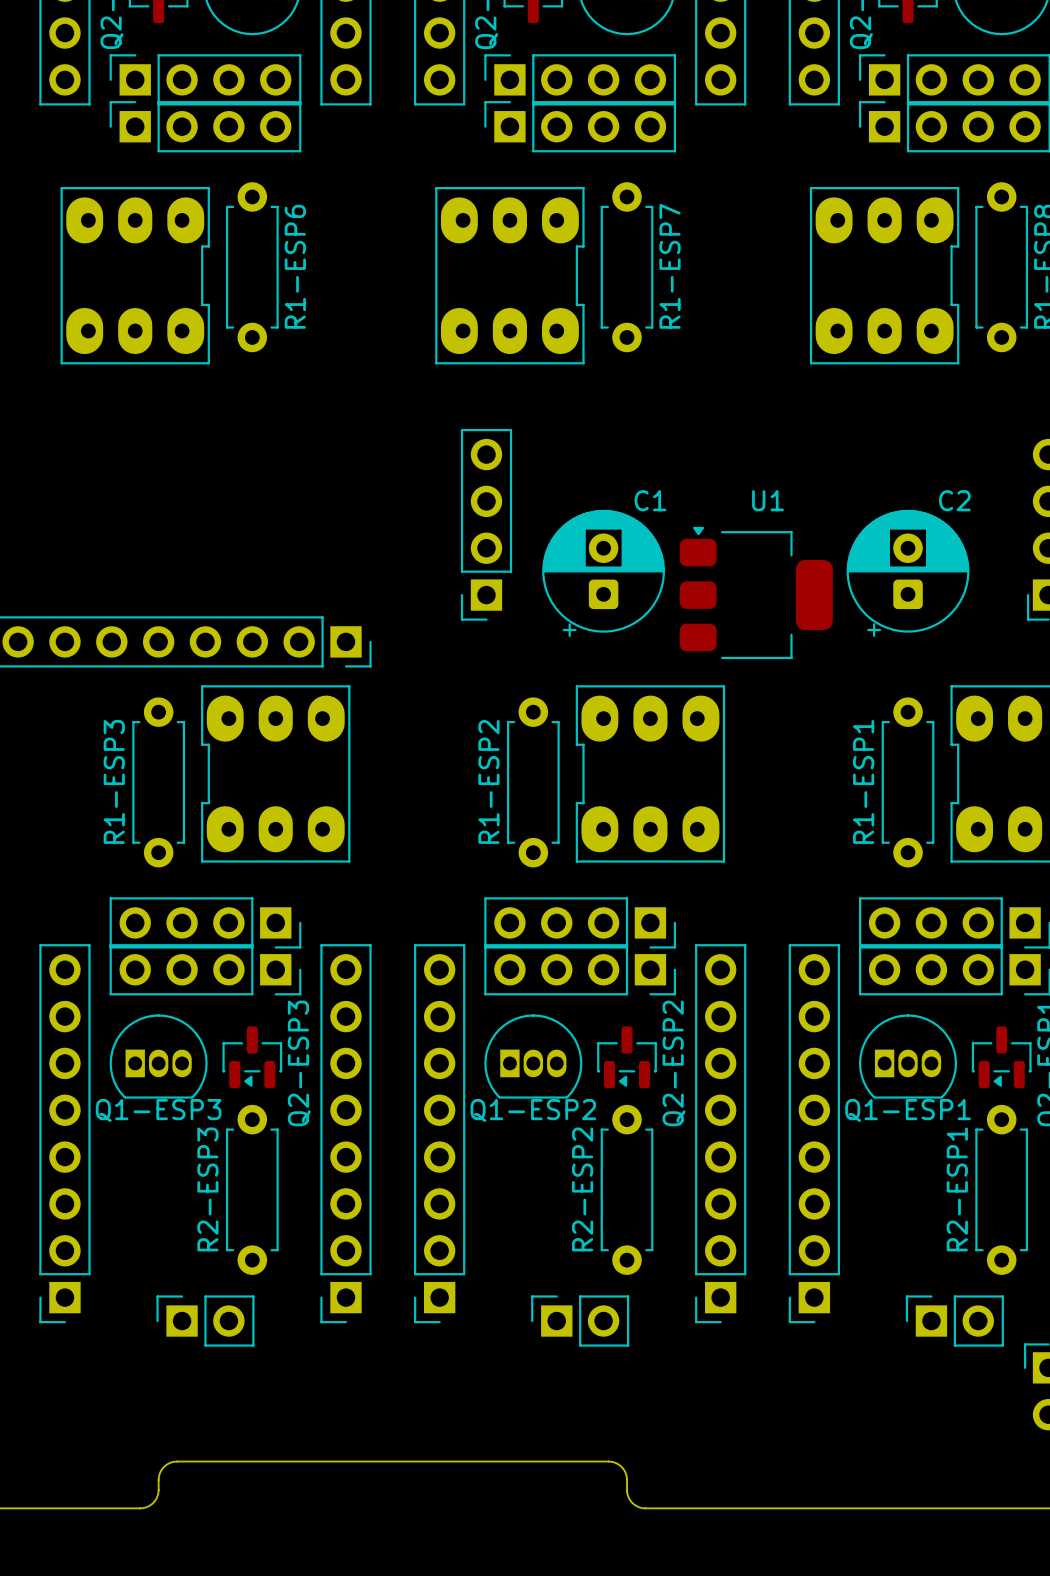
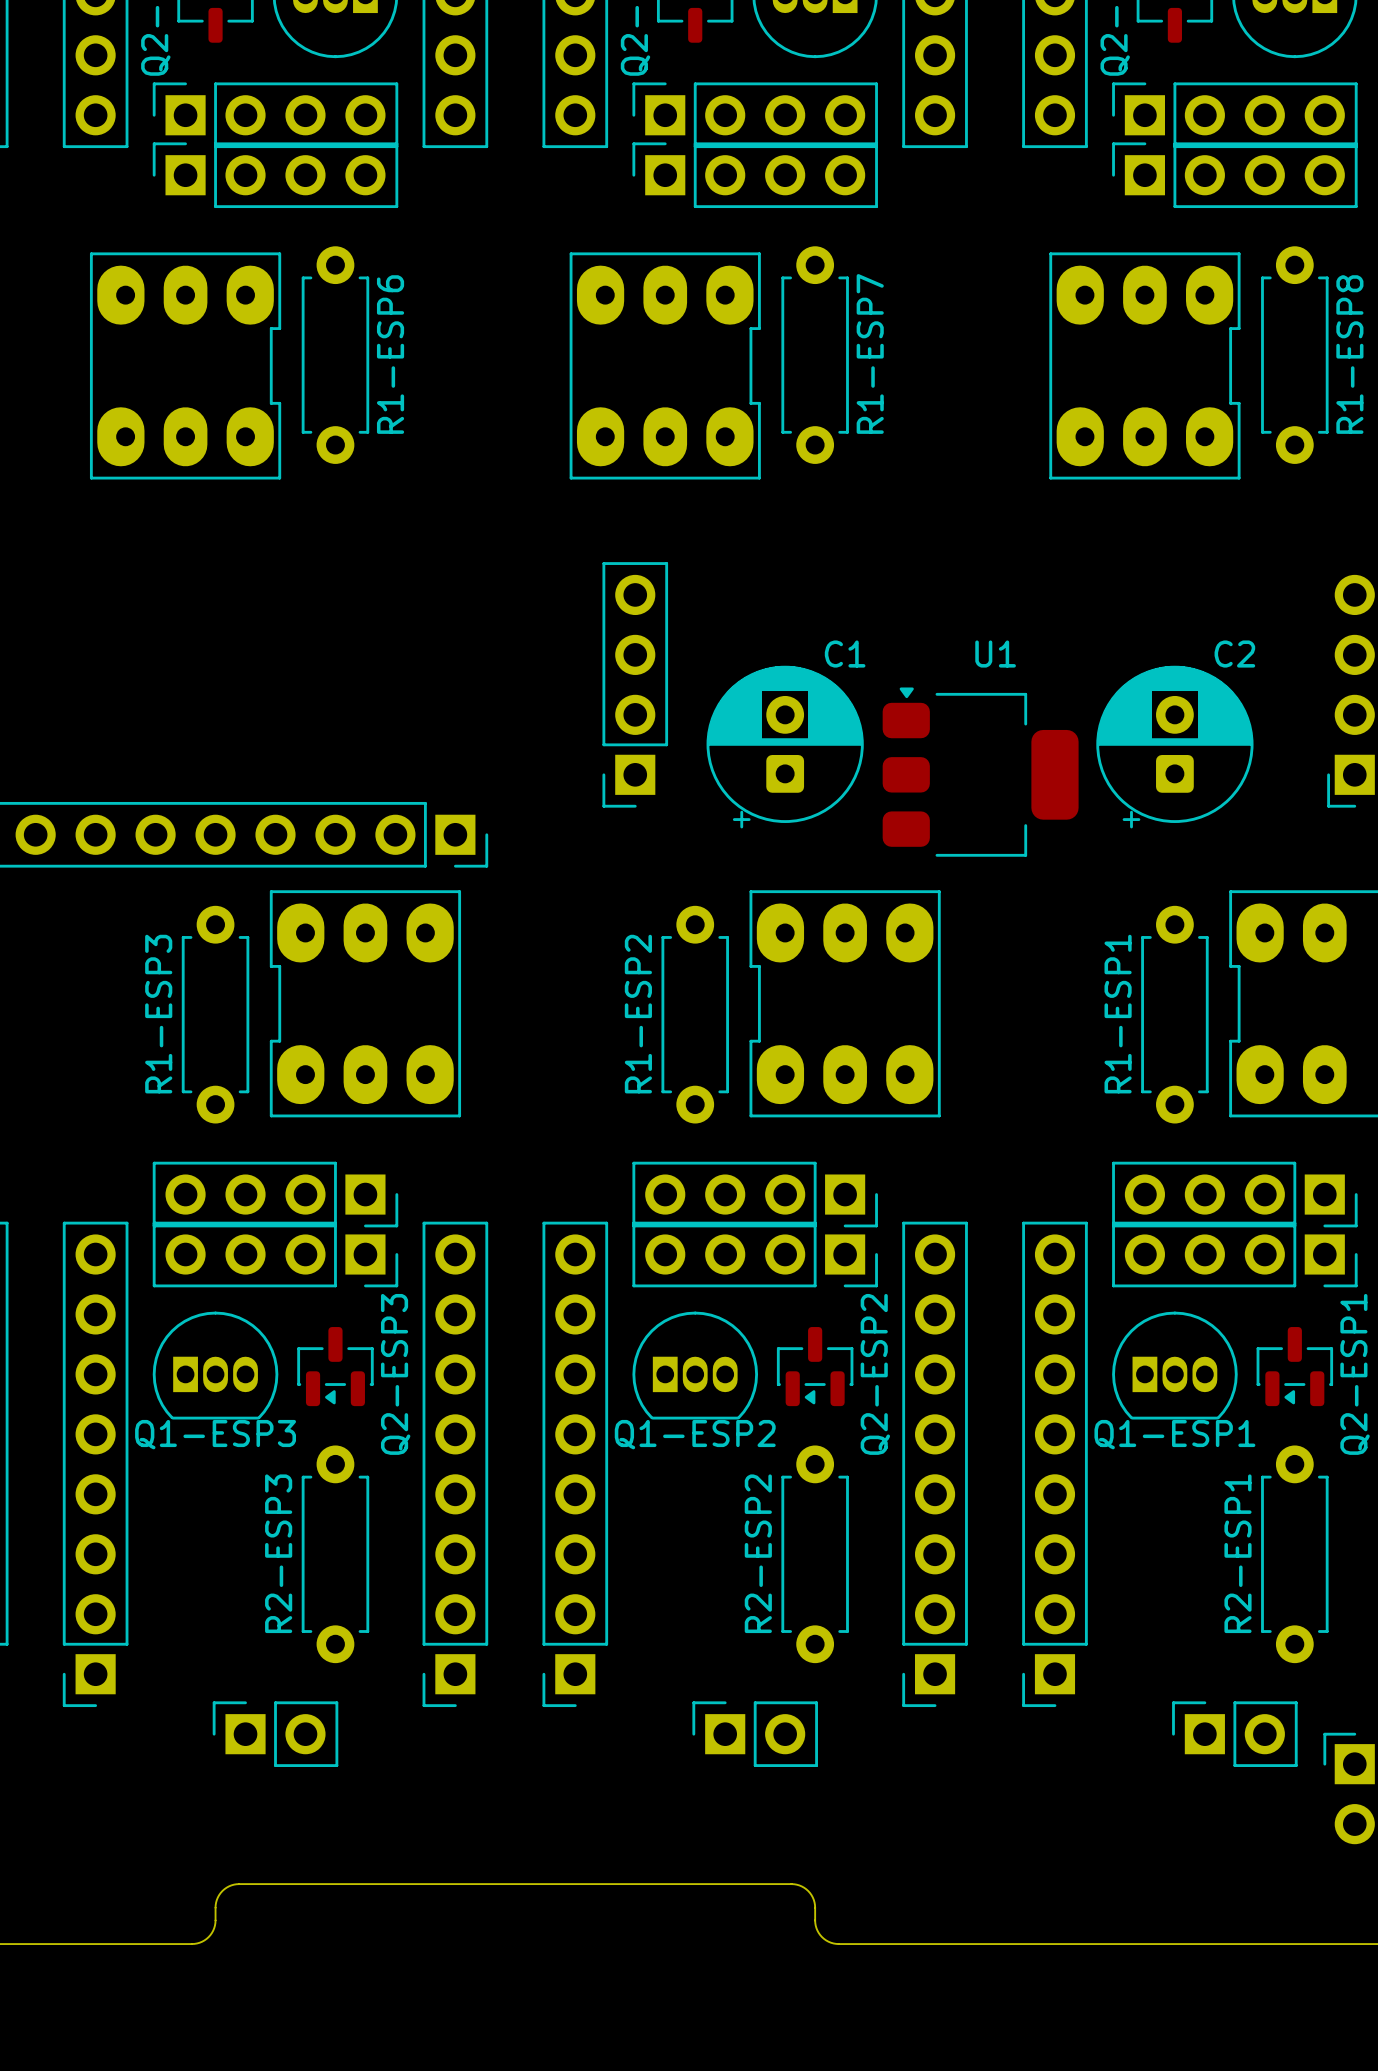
R2-ESP3 position: (252, 1189) -> (335, 1554)
R2-ESP2 position: (627, 1189) -> (815, 1554)
R2-ESP1 position: (1001, 1189) -> (1294, 1554)
part position: (205, 1321) -> (275, 1734)
part position: (580, 1321) -> (755, 1734)
part position: (954, 1321) -> (1234, 1734)

